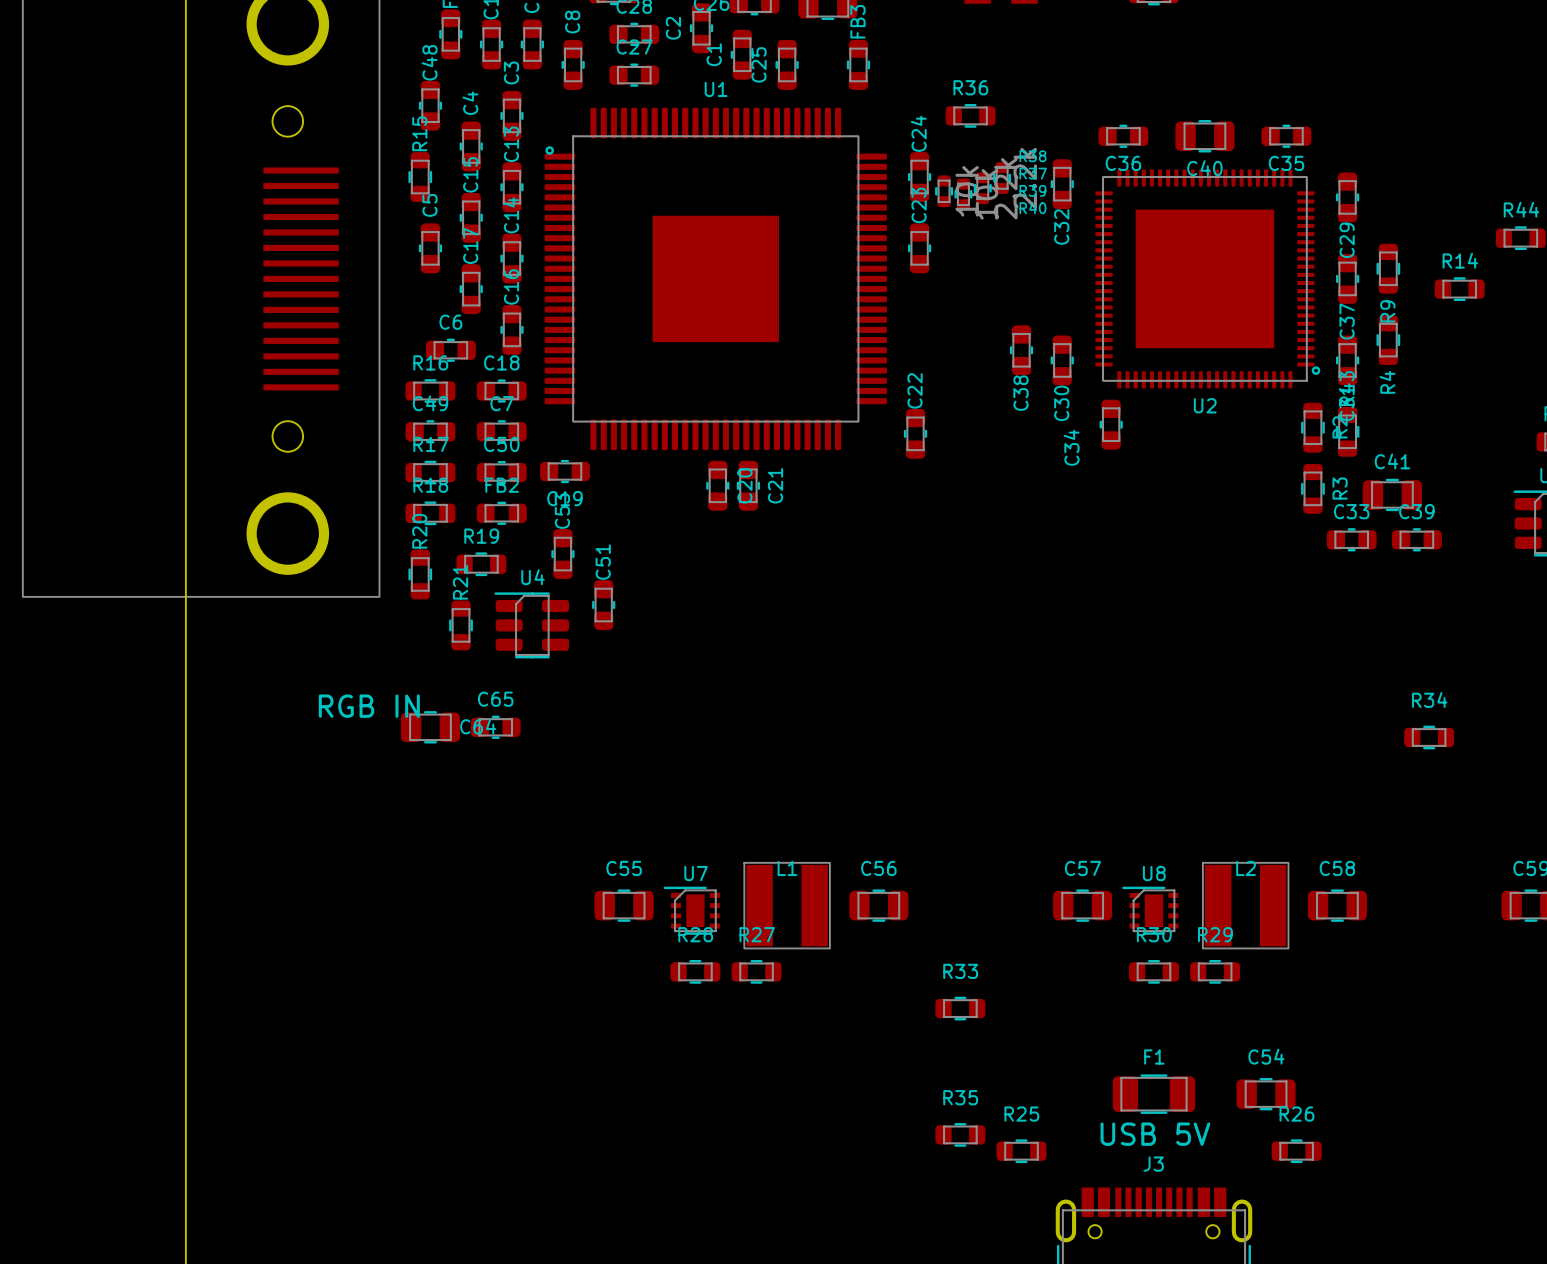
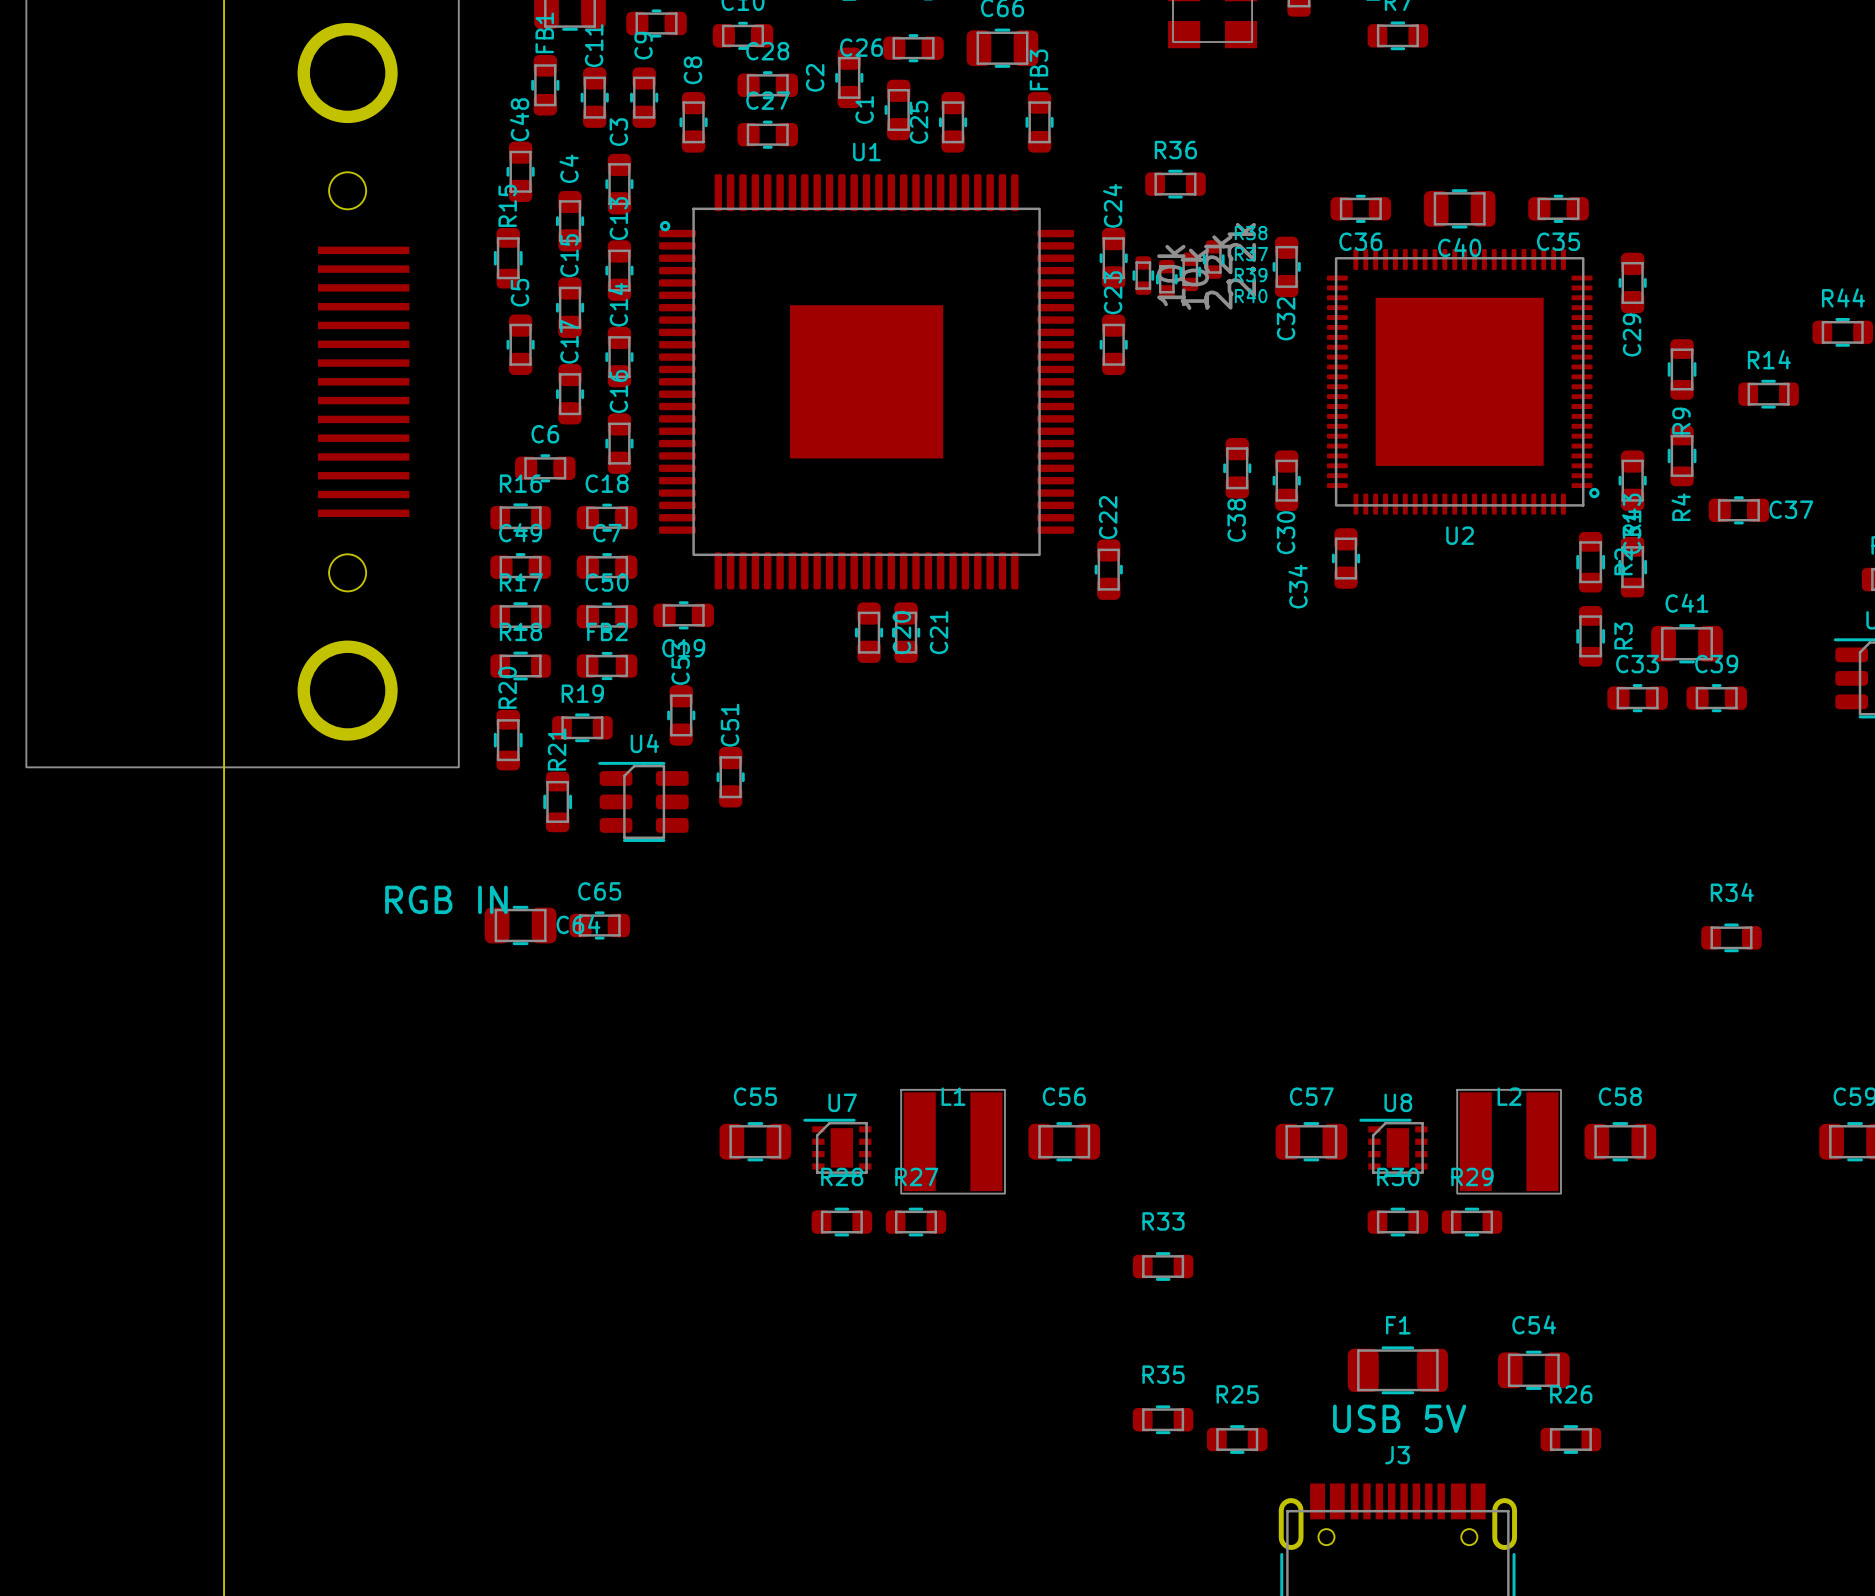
C37 rotation: 0° (1347, 278) -> 90° clockwise (1738, 510)
C37 position: (1347, 278) -> (1738, 510)
C37 name position: C37 (1347, 321) -> C37 (1791, 509)

